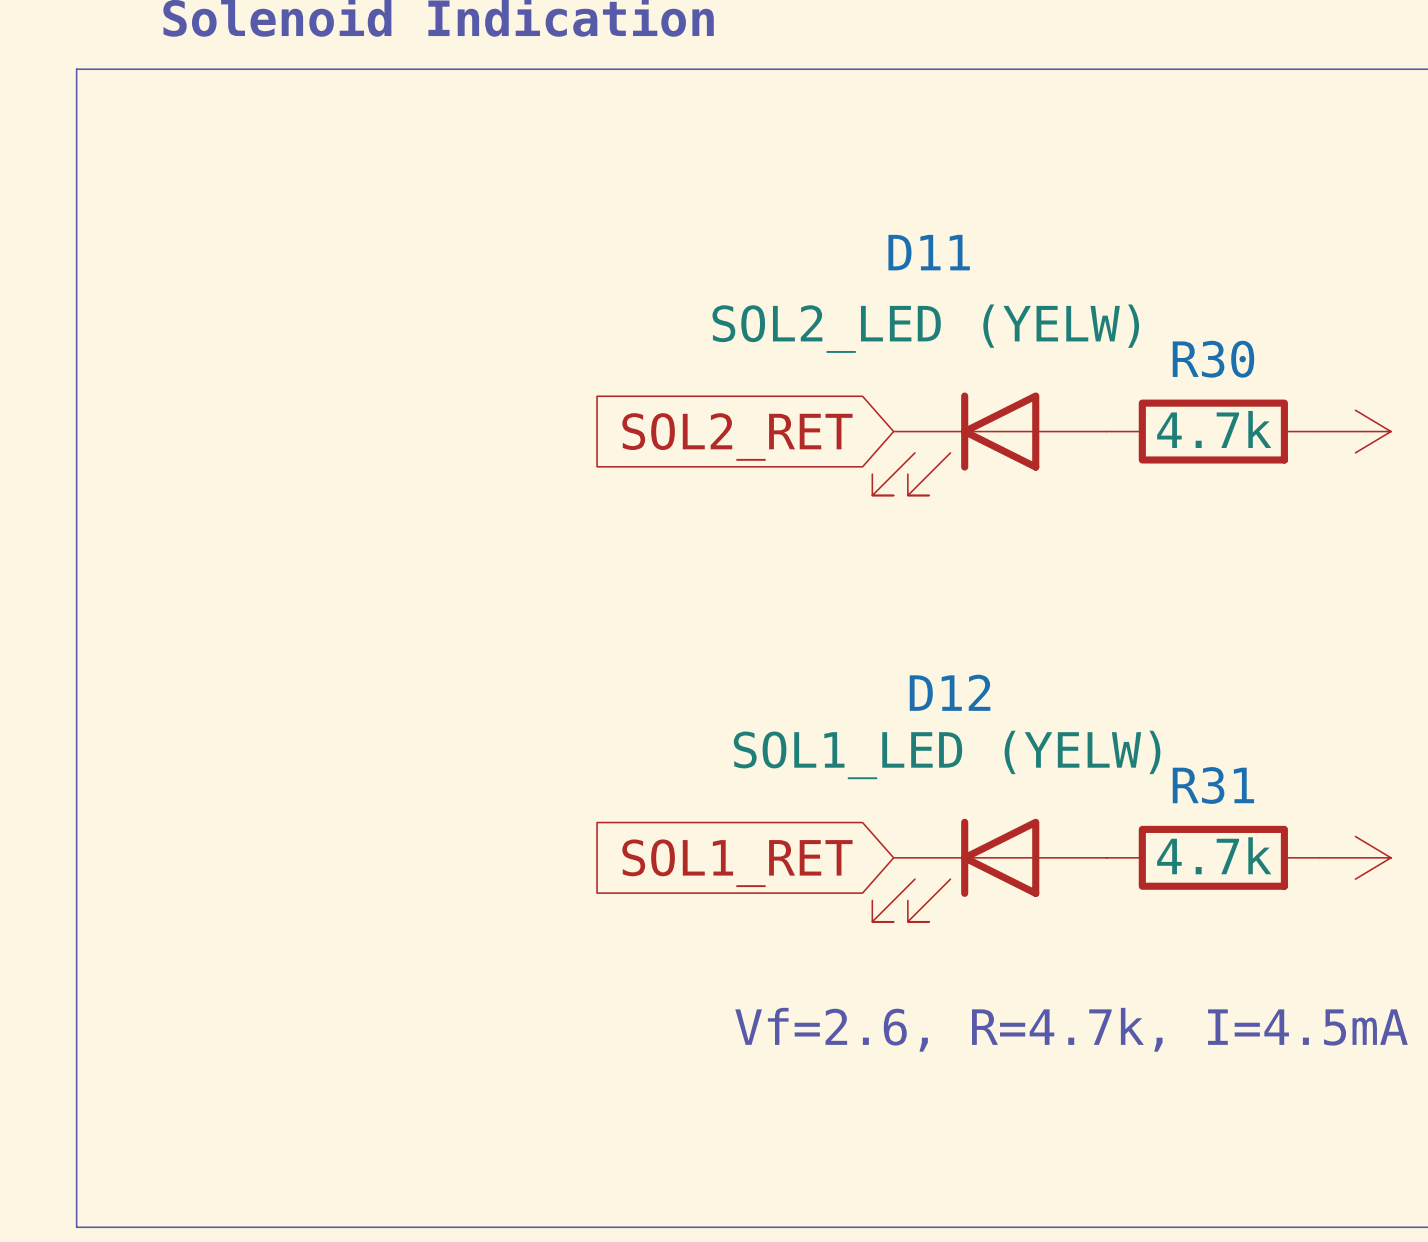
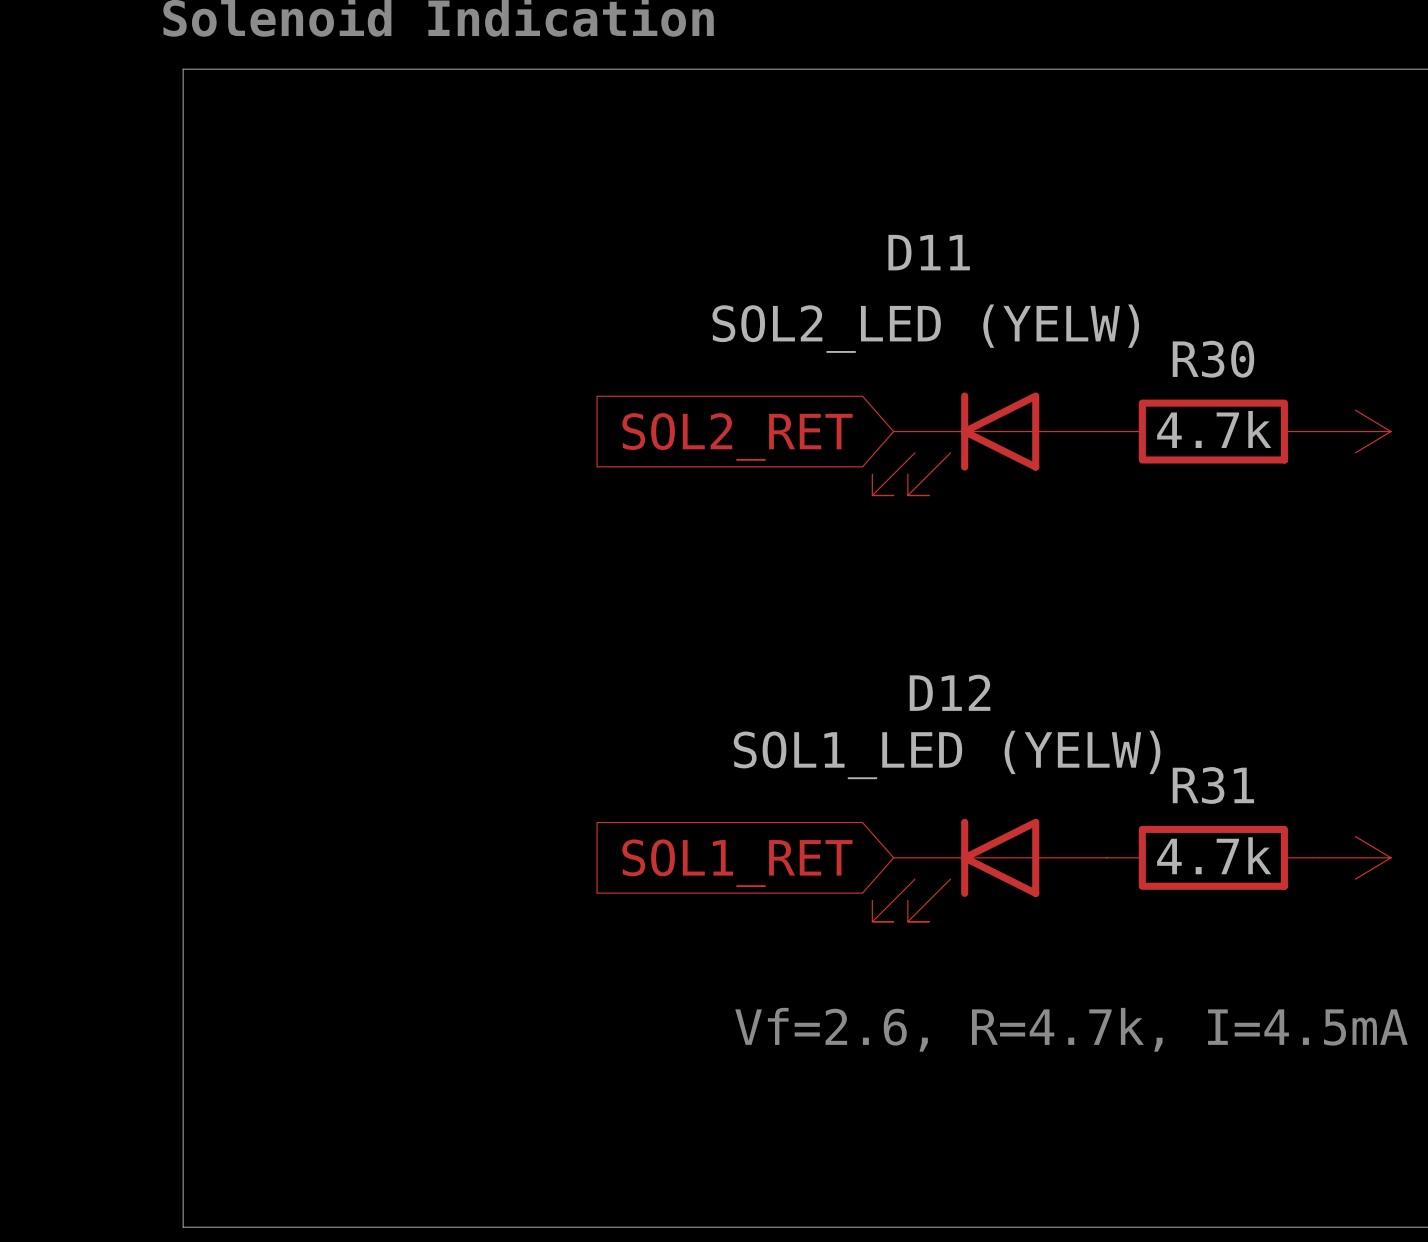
line: (183, 69) (76, 69) (76, 1227) (183, 1227) -> (183, 69) (183, 1227)

